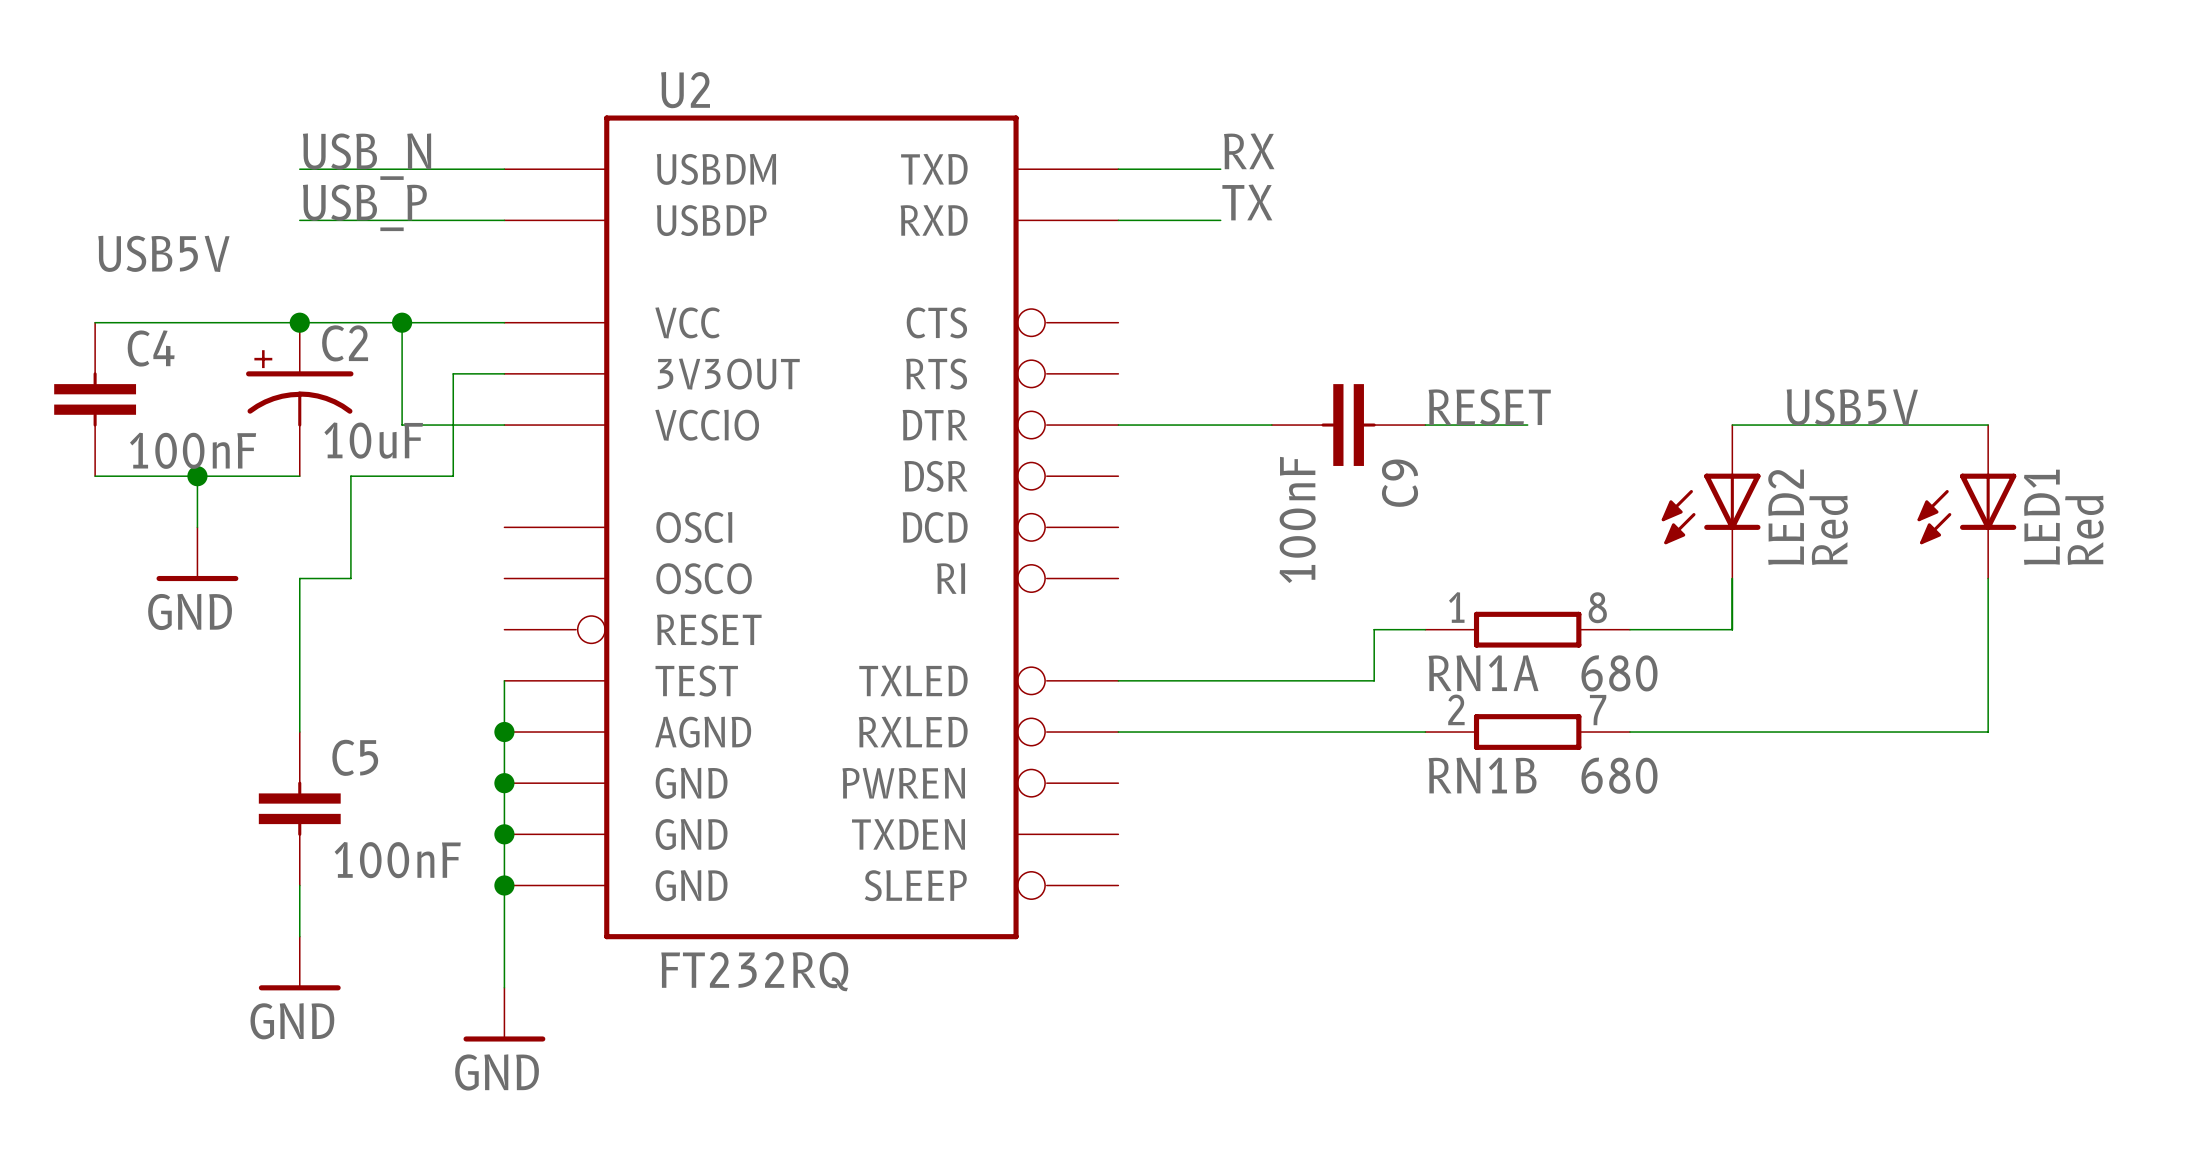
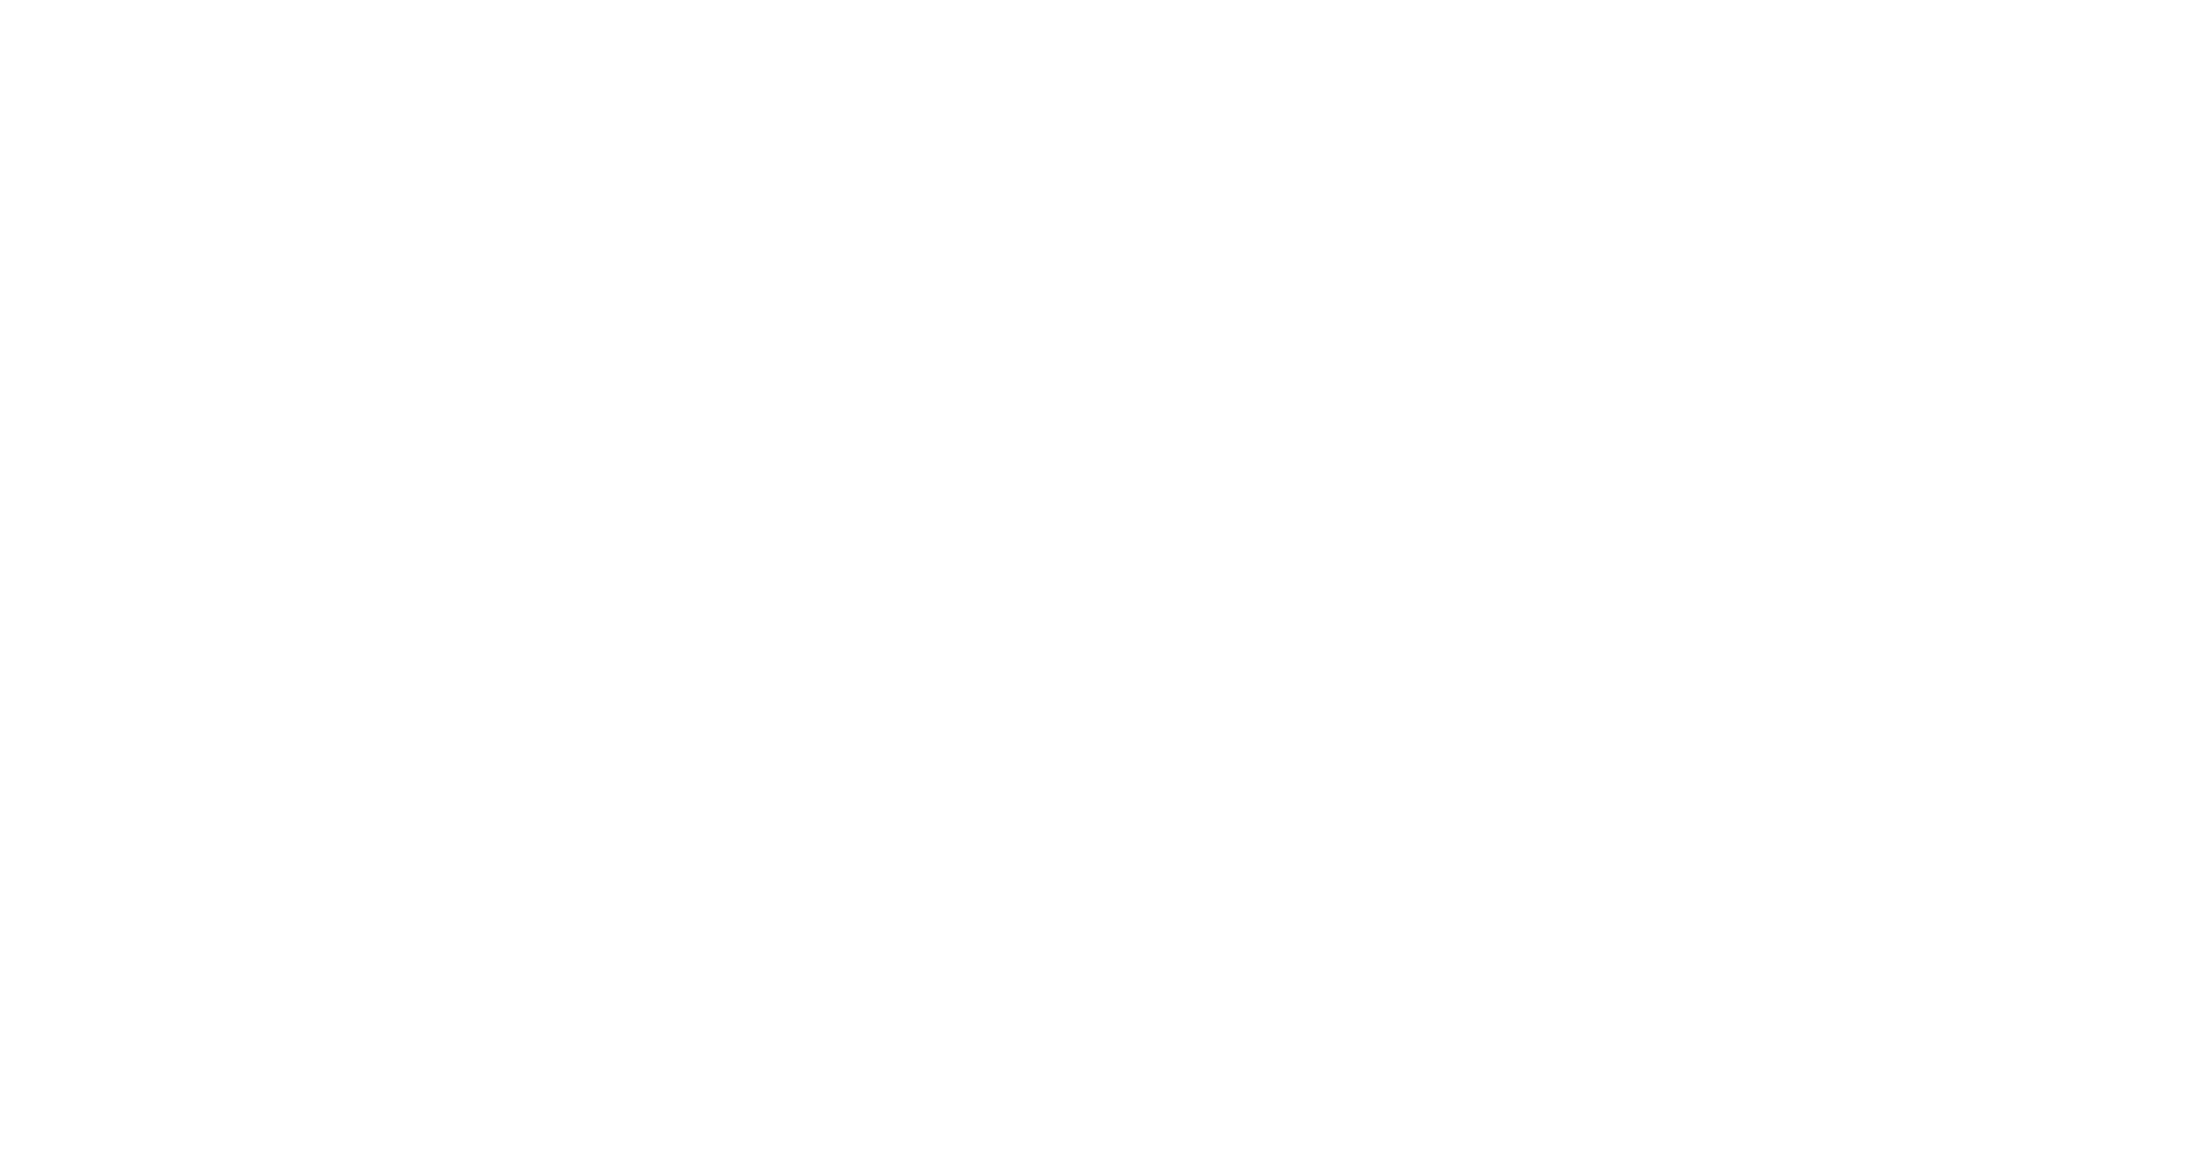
label: RX (1249, 151) -> none
label: USB_N (367, 156) -> none
wire: (299, 169) (504, 169) -> none
wire: (1118, 169) (1220, 169) -> none
label: TX (1247, 202) -> none
label: USB_P (364, 207) -> none
wire: (299, 220) (504, 220) -> none
wire: (1118, 220) (1220, 220) -> none
label: USB5V (163, 253) -> none
wire: (95, 322) (504, 322) -> none
junction: (299, 322) -> none
wire: (402, 322) (402, 425) (504, 425) -> none
junction: (402, 322) -> none
wire: (504, 373) (453, 373) (453, 476) (350, 476) (350, 578) (299, 578) (299, 732) -> none
C4: 100nF (95, 399) -> none
C2: 10uF (299, 399) -> none
label: RESET (1489, 407) -> none
label: USB5V (1852, 407) -> none
wire: (1118, 425) (1271, 425) -> none
C9: 100nF (1348, 425) -> none
wire: (1425, 425) (1527, 425) -> none
wire: (1732, 425) (1988, 425) -> none
wire: (95, 476) (299, 476) -> none
wire: (197, 476) (197, 527) -> none
junction: (197, 476) -> none
LED2: Red (1711, 501) -> none
LED1: Red (1966, 501) -> none
U2: FT232RQ (811, 527) -> none
power symbol: GND (197, 554) -> none
wire: (1732, 578) (1732, 629) (1630, 629) -> none
wire: (1988, 578) (1988, 732) (1630, 732) -> none
wire: (1425, 629) (1374, 629) (1374, 680) (1118, 680) -> none
RN1A: 680 (1527, 629) -> none
wire: (504, 680) (504, 987) -> none
junction: (504, 732) -> none
wire: (1118, 732) (1425, 732) -> none
RN1B: 680 (1527, 732) -> none
junction: (504, 783) -> none
C5: 100nF (299, 808) -> none
junction: (504, 834) -> none
wire: (299, 885) (299, 936) -> none
junction: (504, 885) -> none
power symbol: GND (299, 963) -> none
power symbol: GND (504, 1014) -> none

